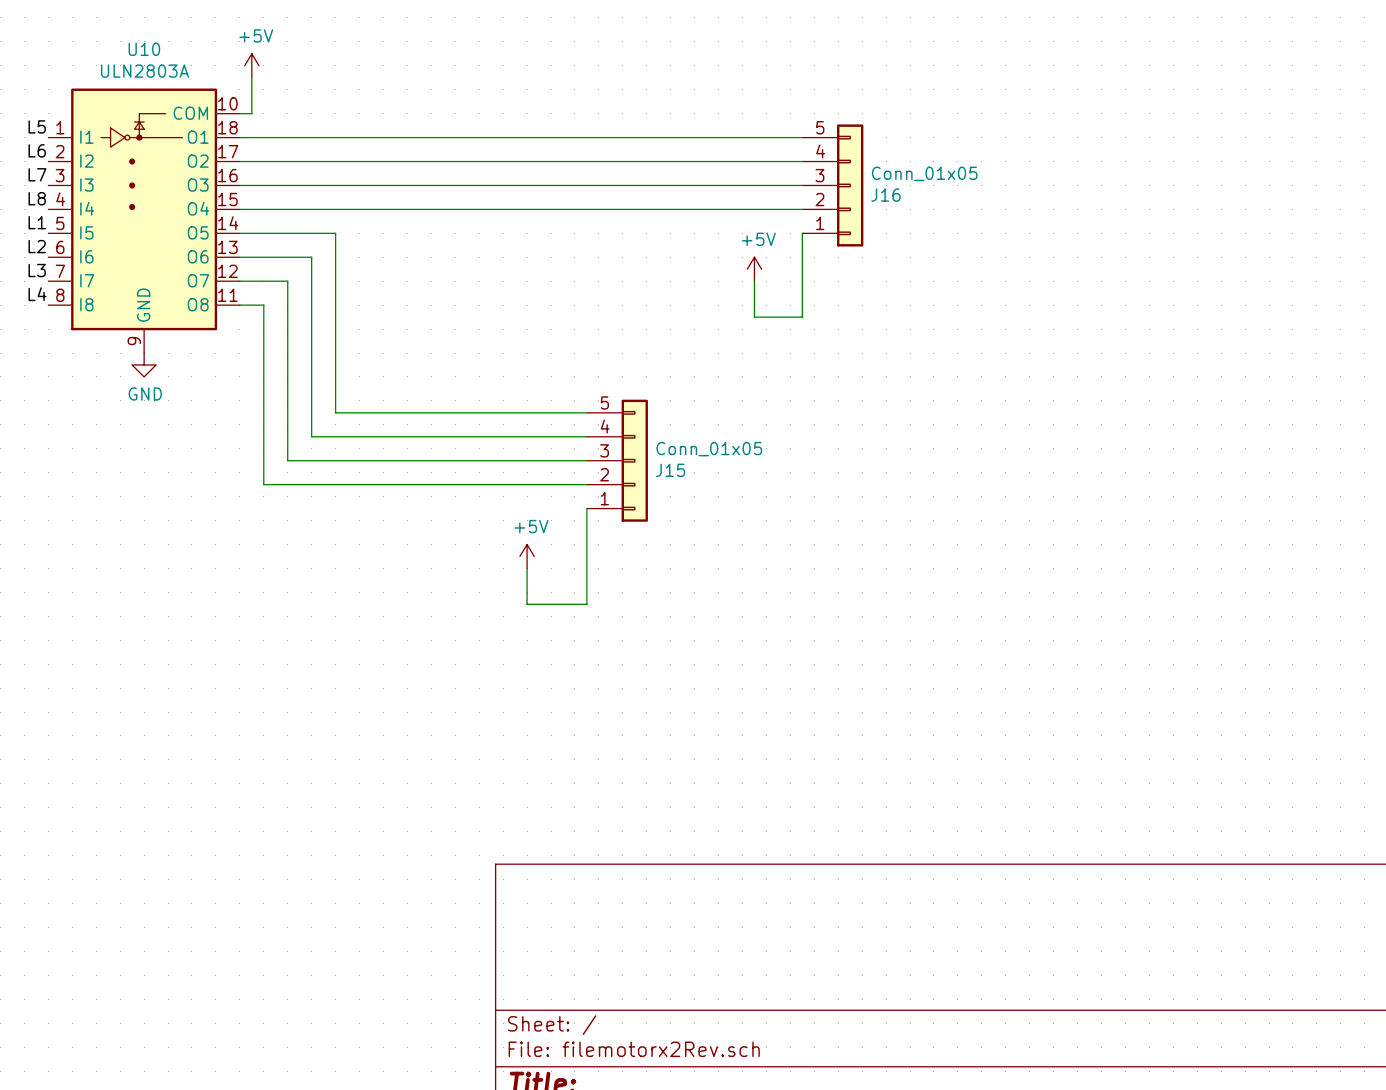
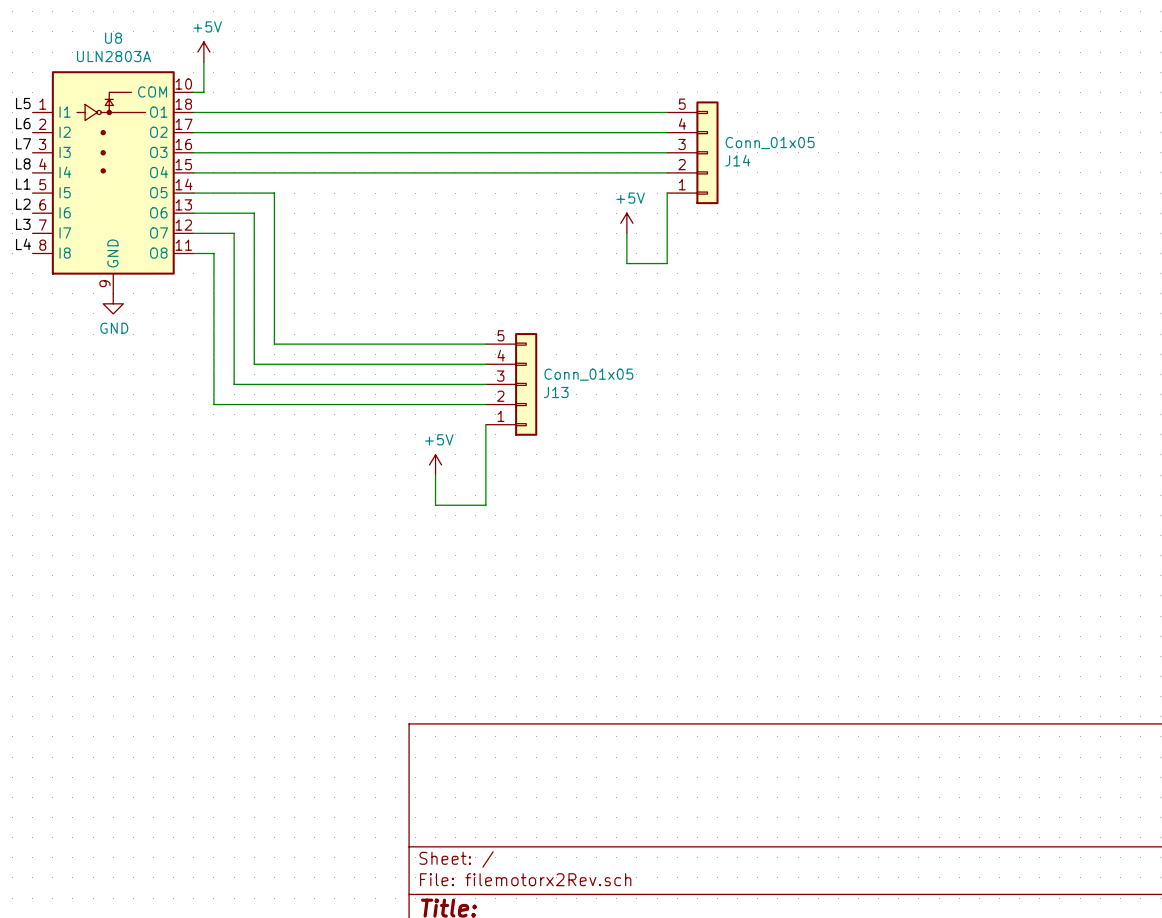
U10 name: U10 (144, 49) -> U8 (113, 38)
J16 name: J16 (885, 195) -> J14 (737, 160)
J15 name: J15 (670, 470) -> J13 (556, 392)

